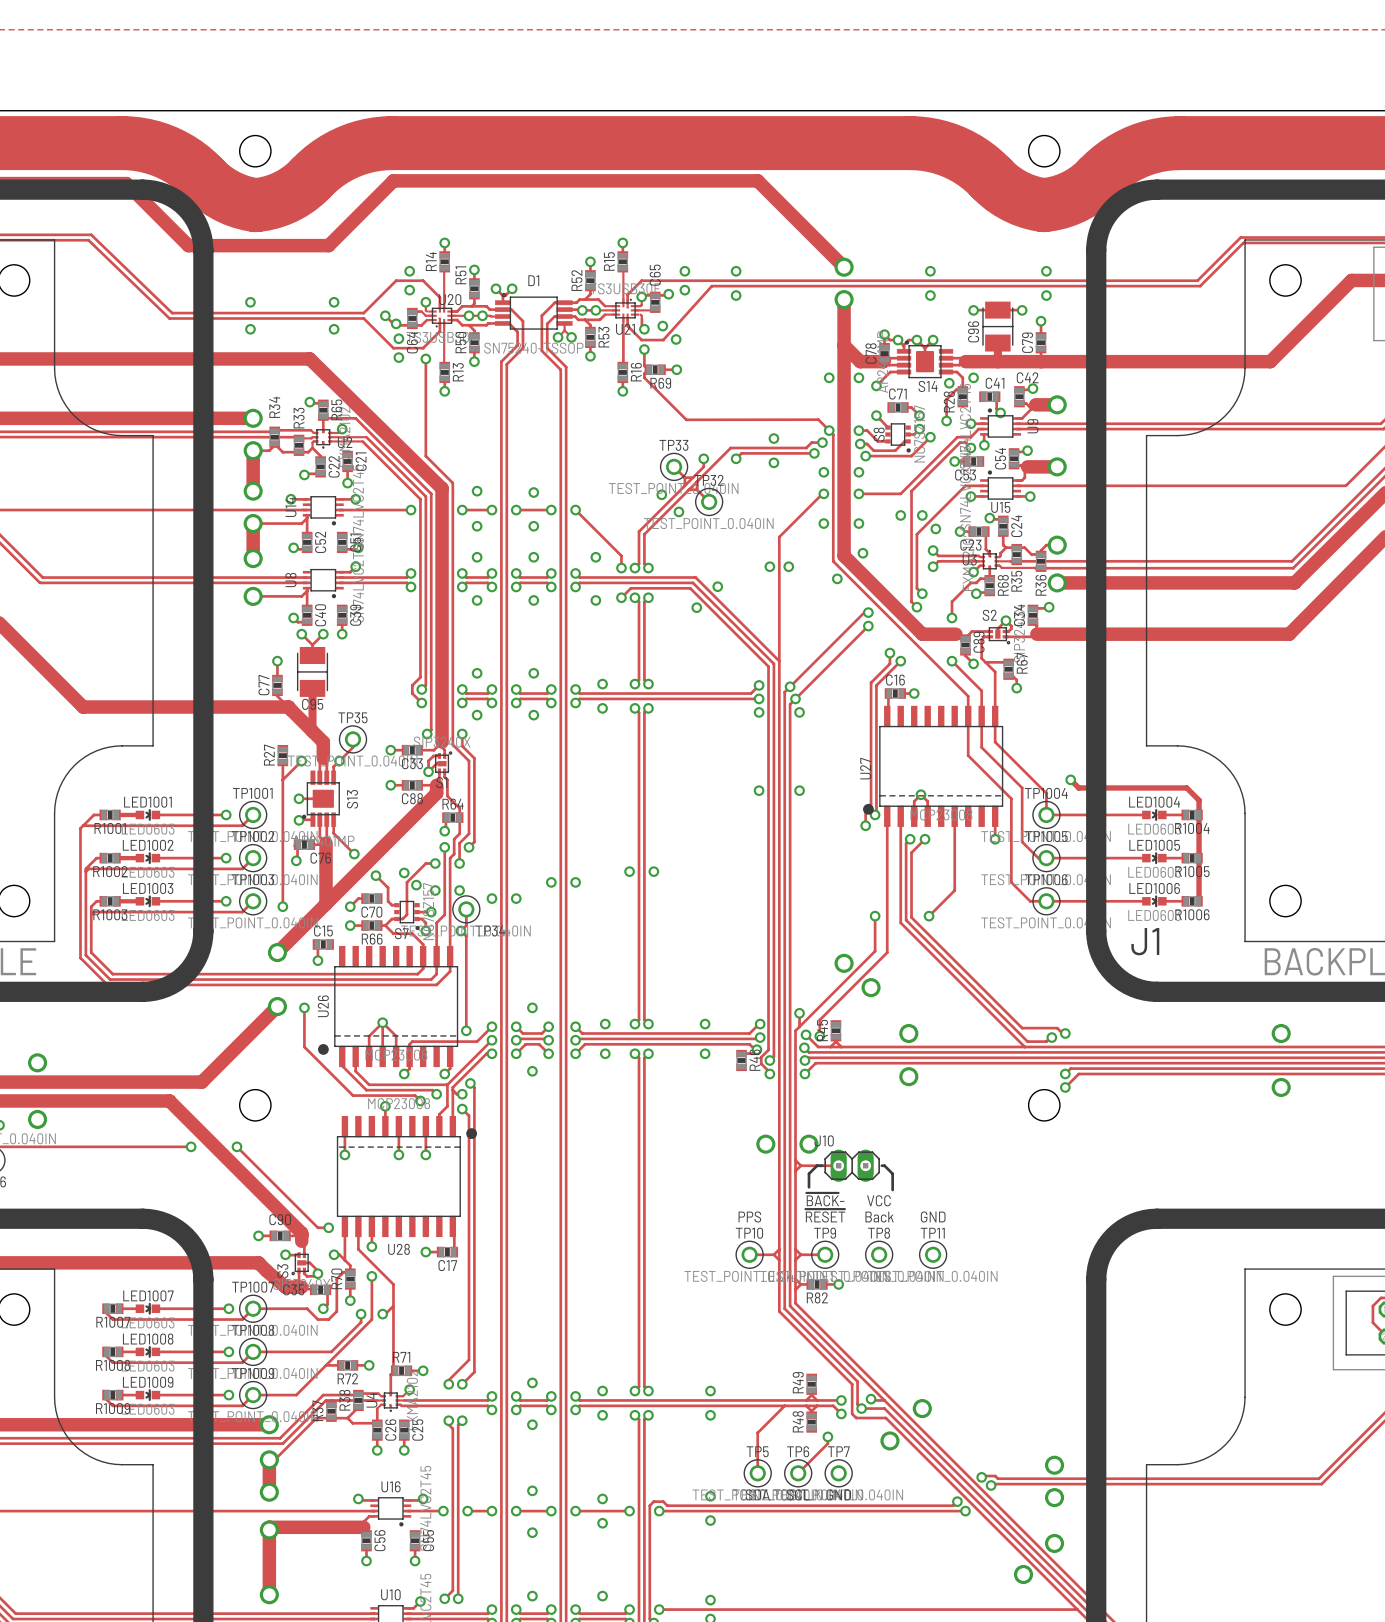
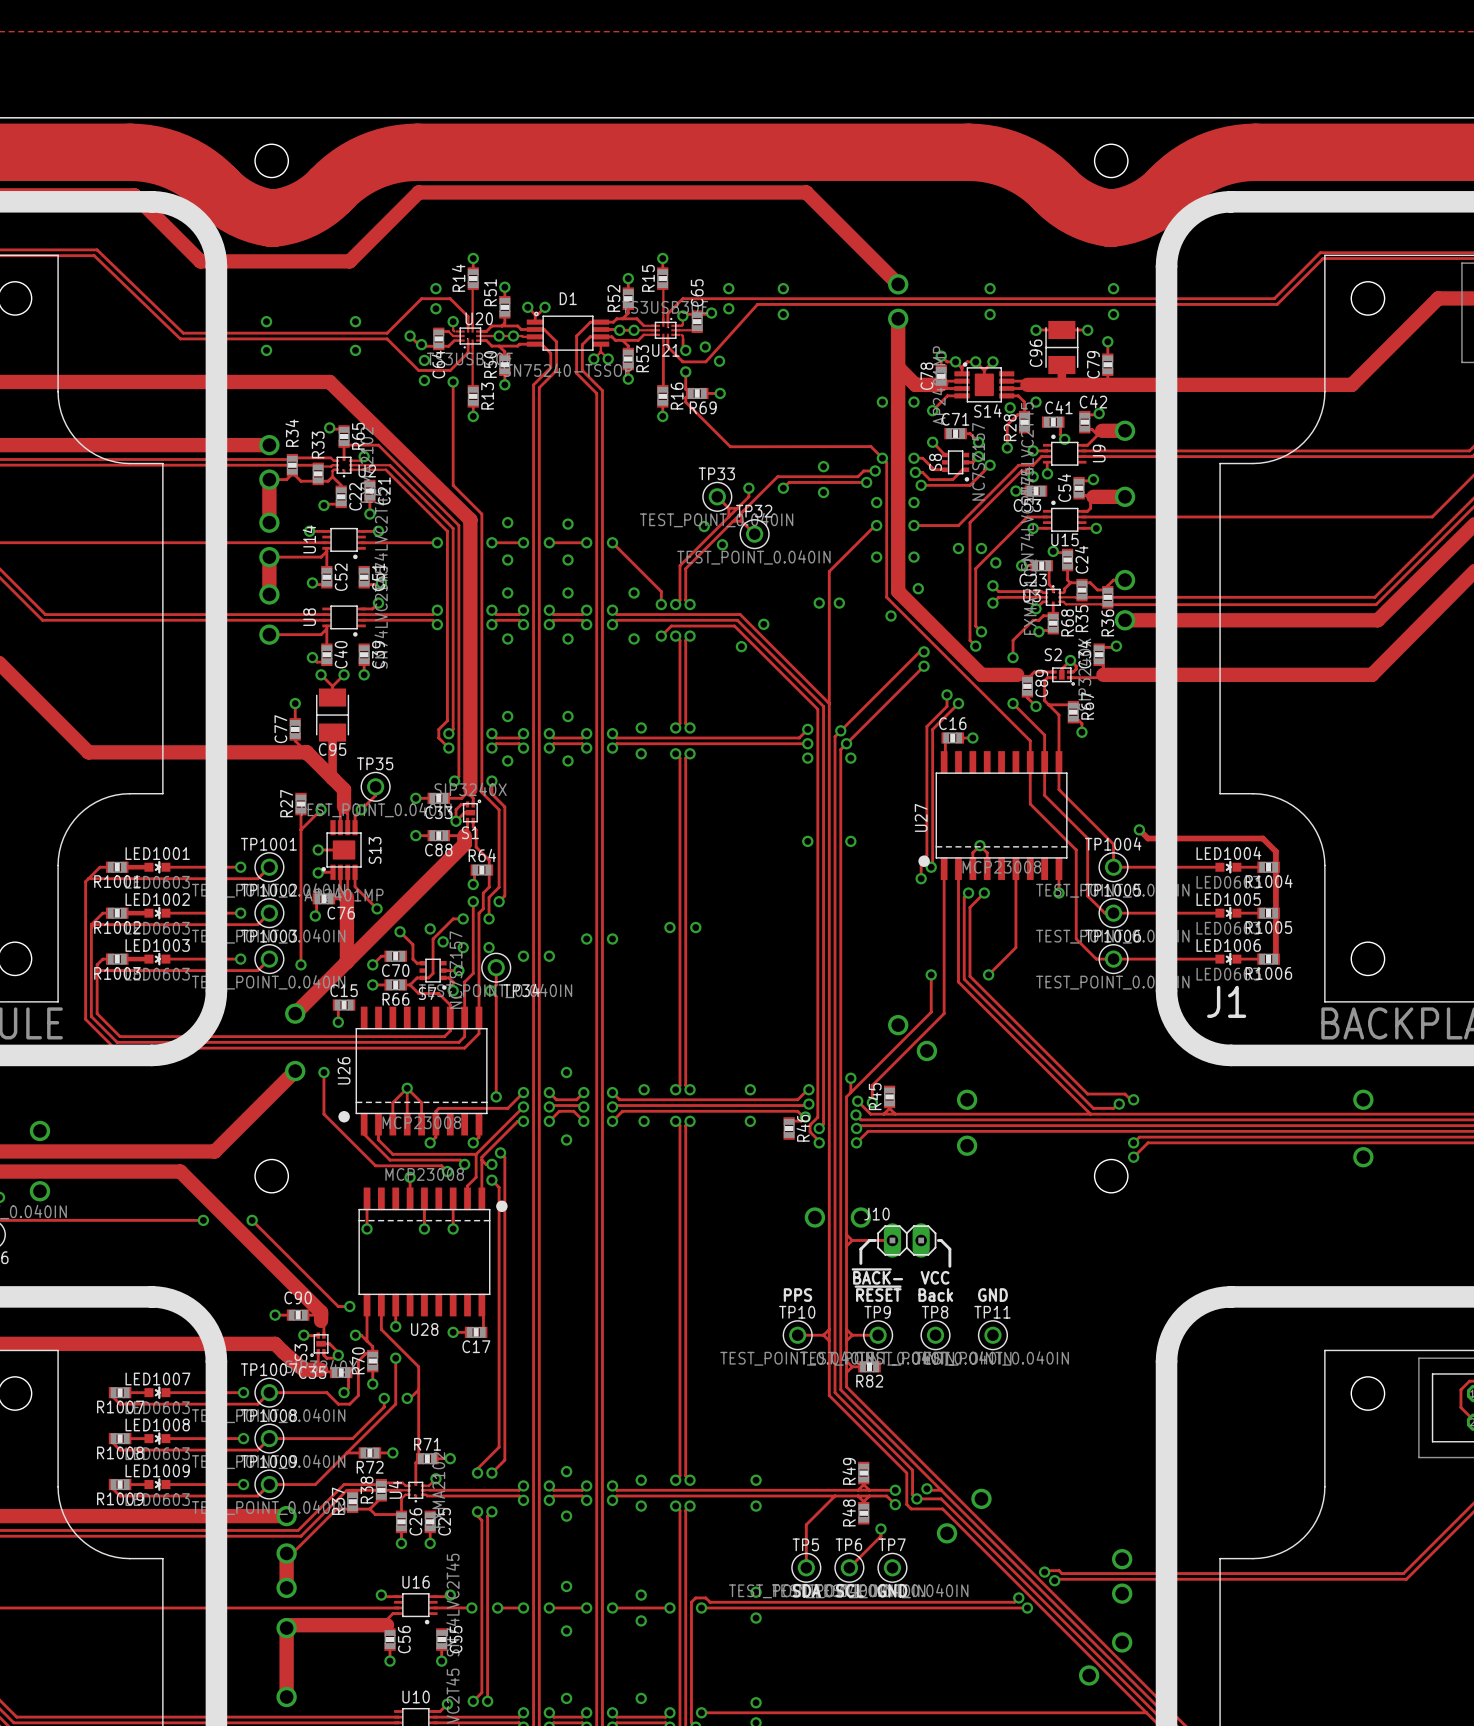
track: (823, 1284) (838, 1284) -> none
via: (838, 1284) -> none

